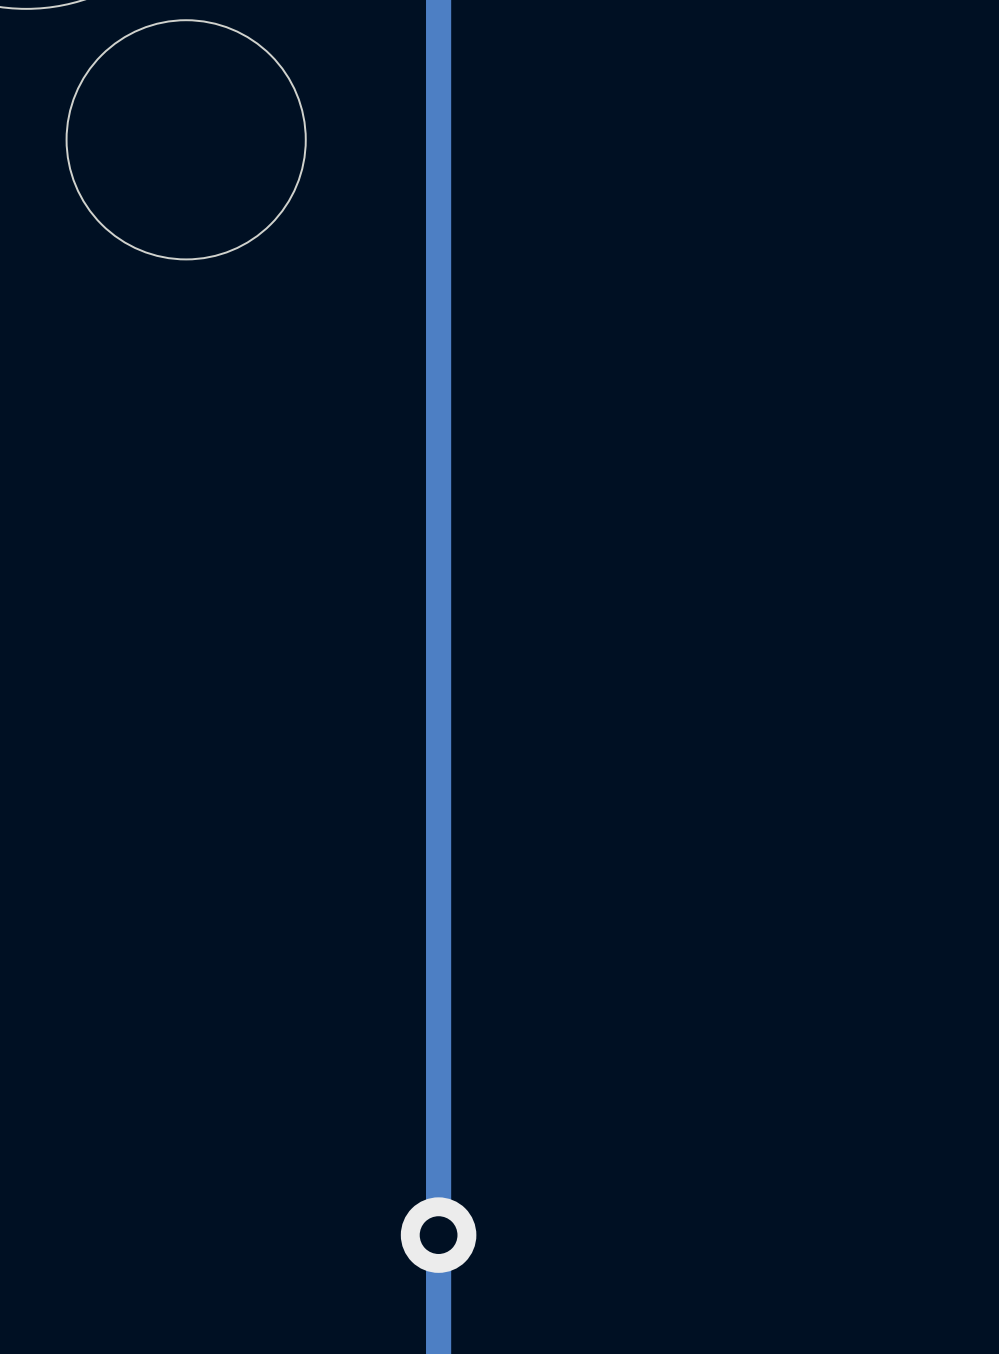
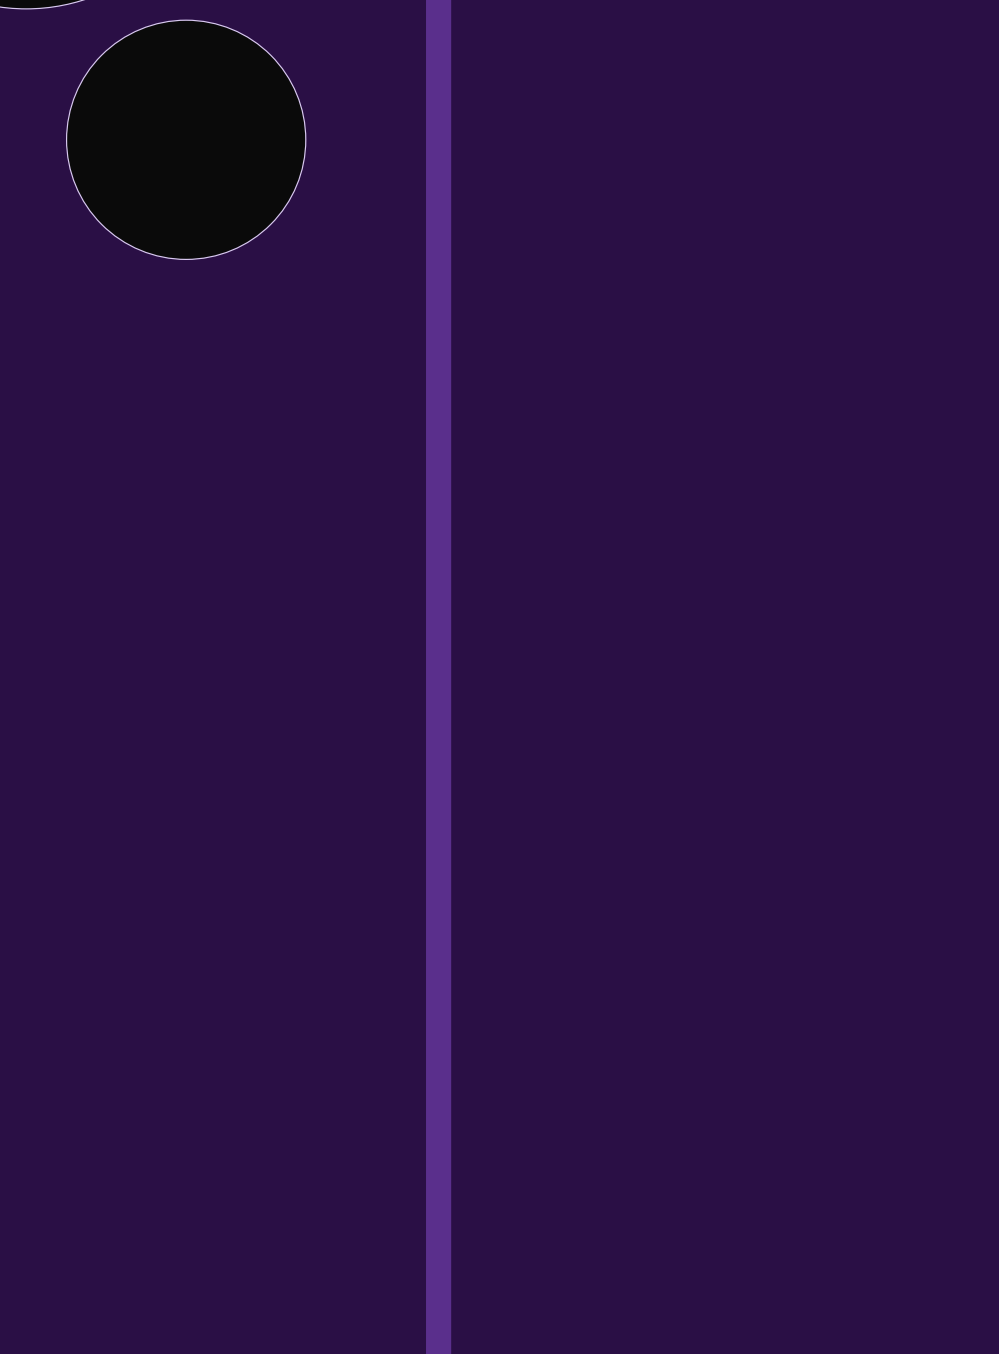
via: (438, 1235) -> none

